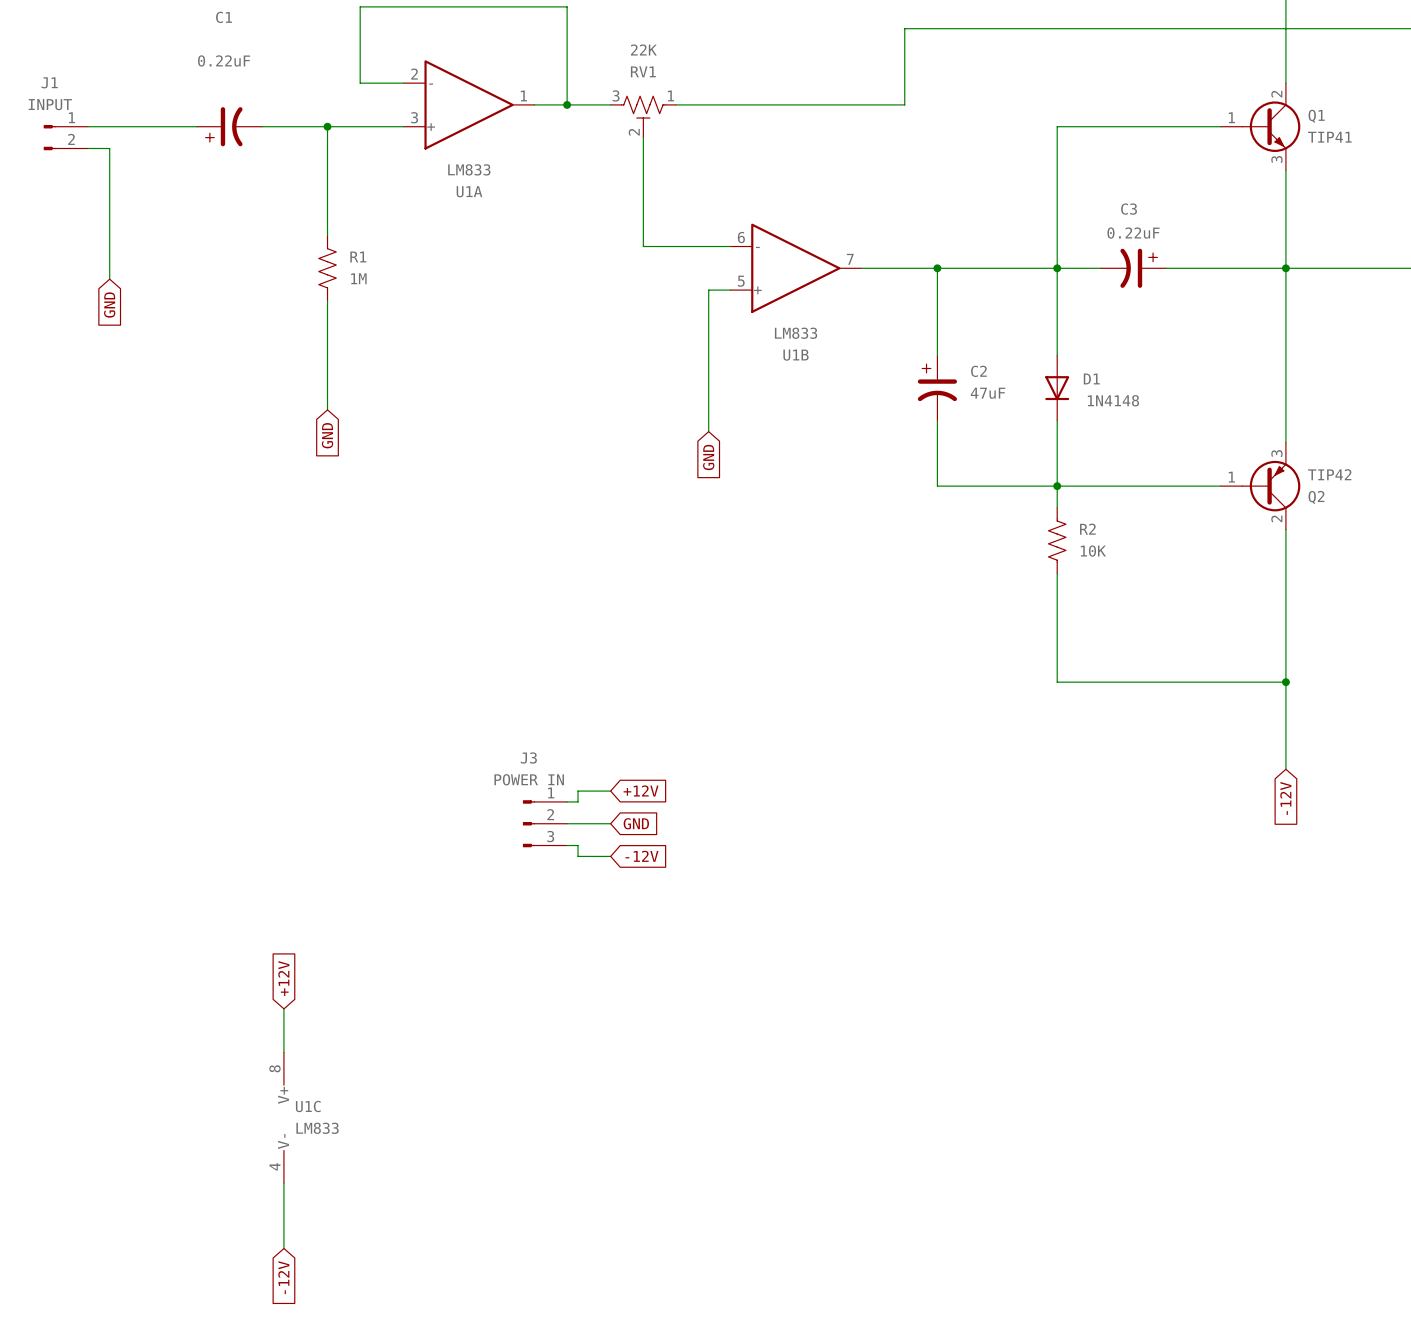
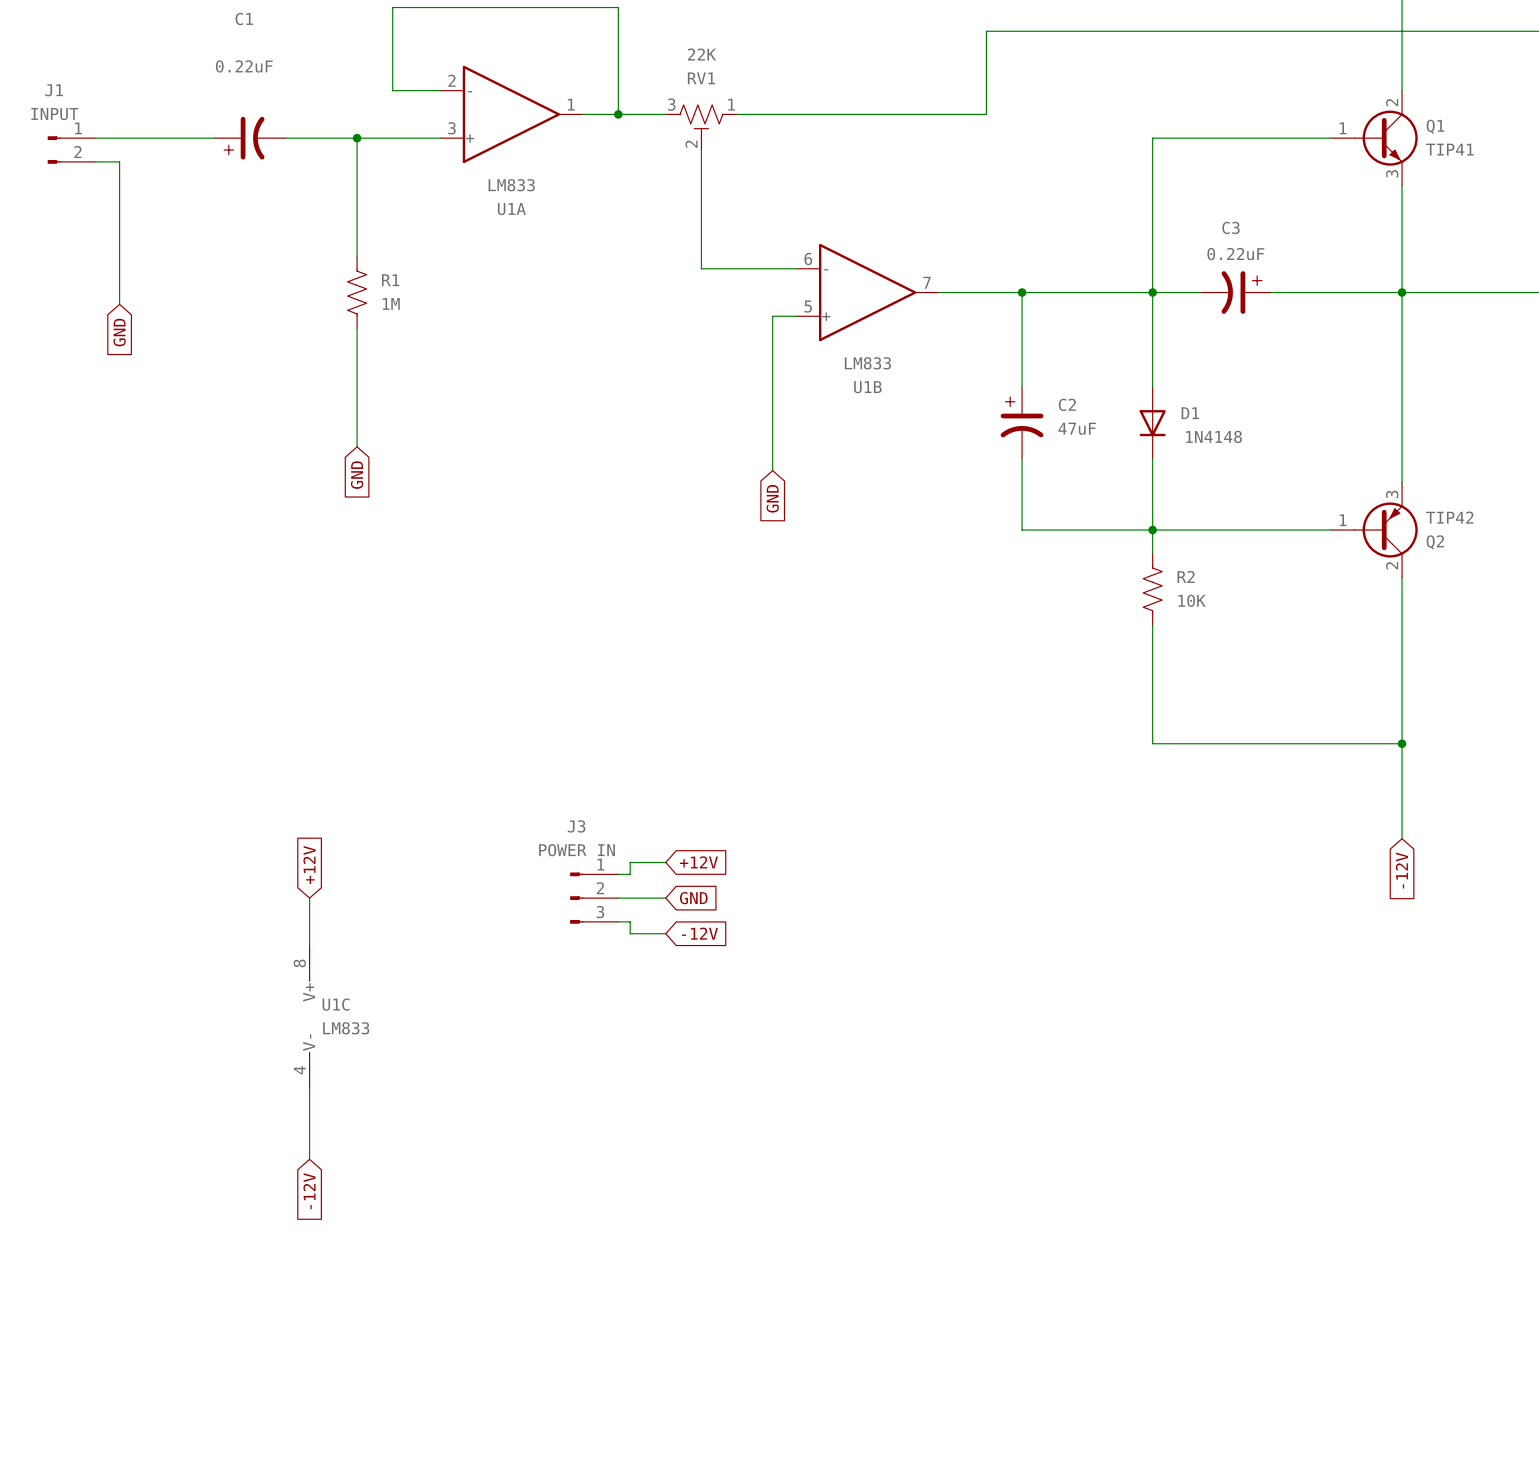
wire: none -> (309, 898) (309, 945)
global label position: +12V (283, 978) -> +12V (309, 865)
wire: none -> (309, 1088) (309, 1099)
U1C position: (283, 1117) -> (309, 1016)
wire: (283, 1183) (283, 1248) -> none
global label position: -12V (283, 1277) -> -12V (309, 1191)

